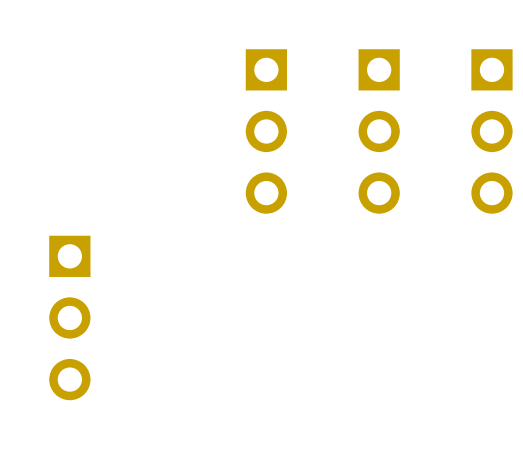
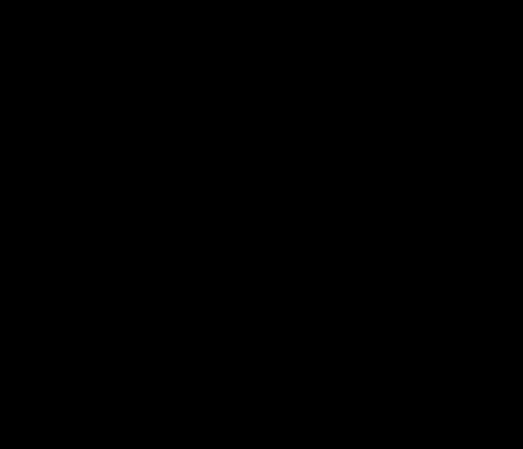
part: (266, 131) -> none
part: (379, 131) -> none
part: (491, 131) -> none
part: (69, 317) -> none

